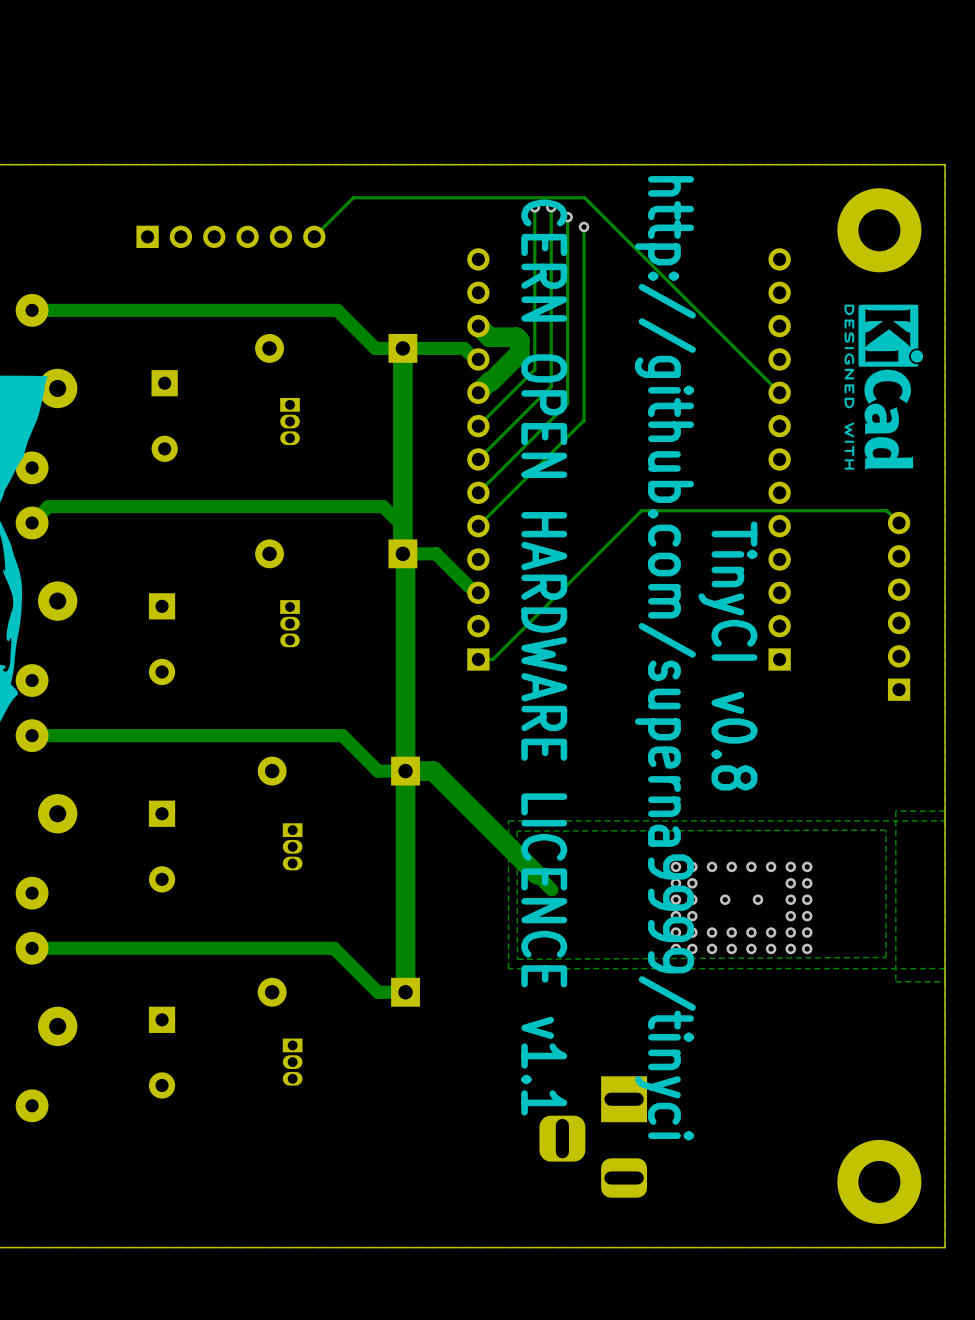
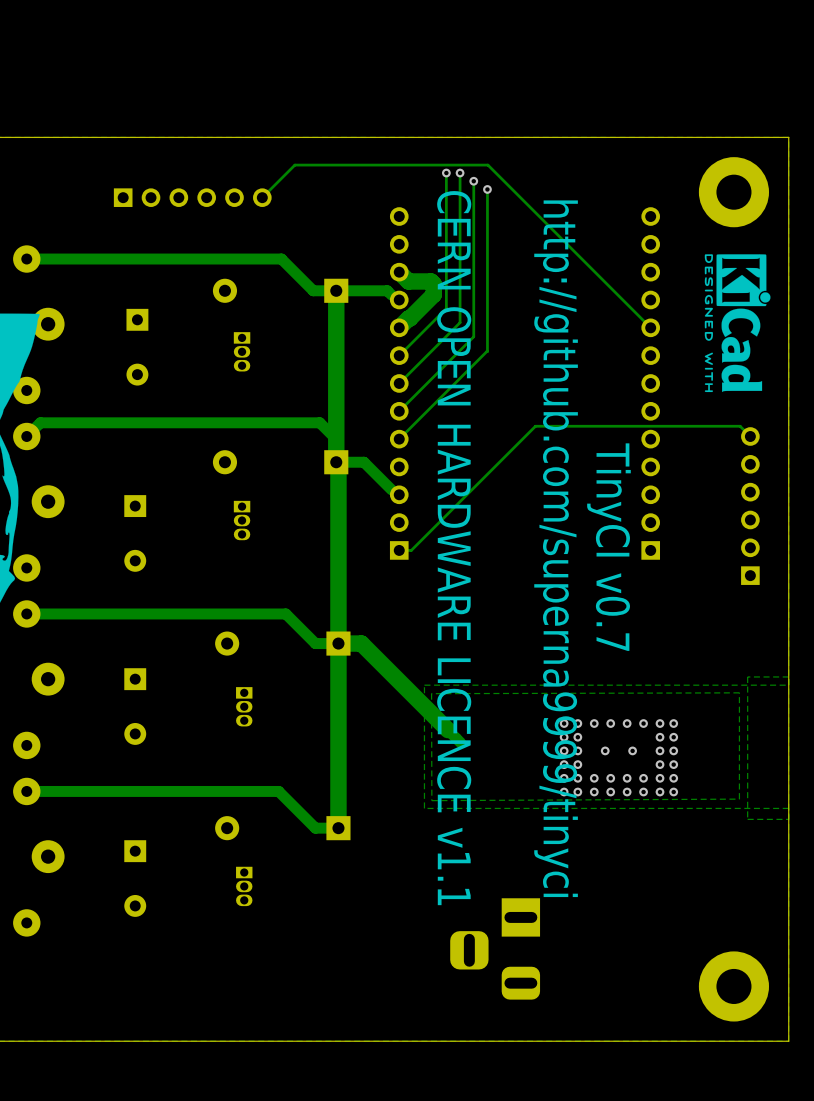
text: TinyCI v0.8 (727, 655) -> TinyCI v0.7 (608, 547)

